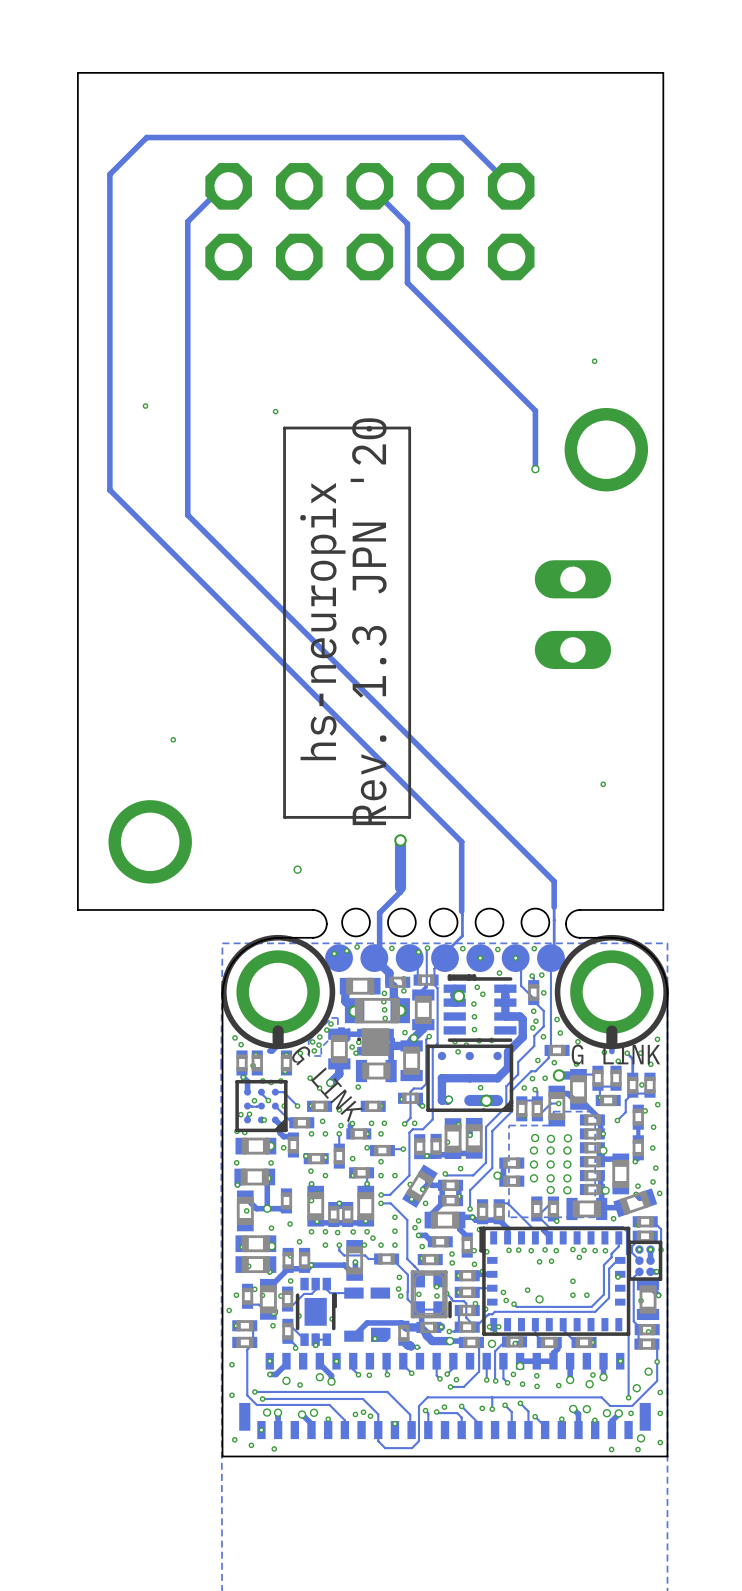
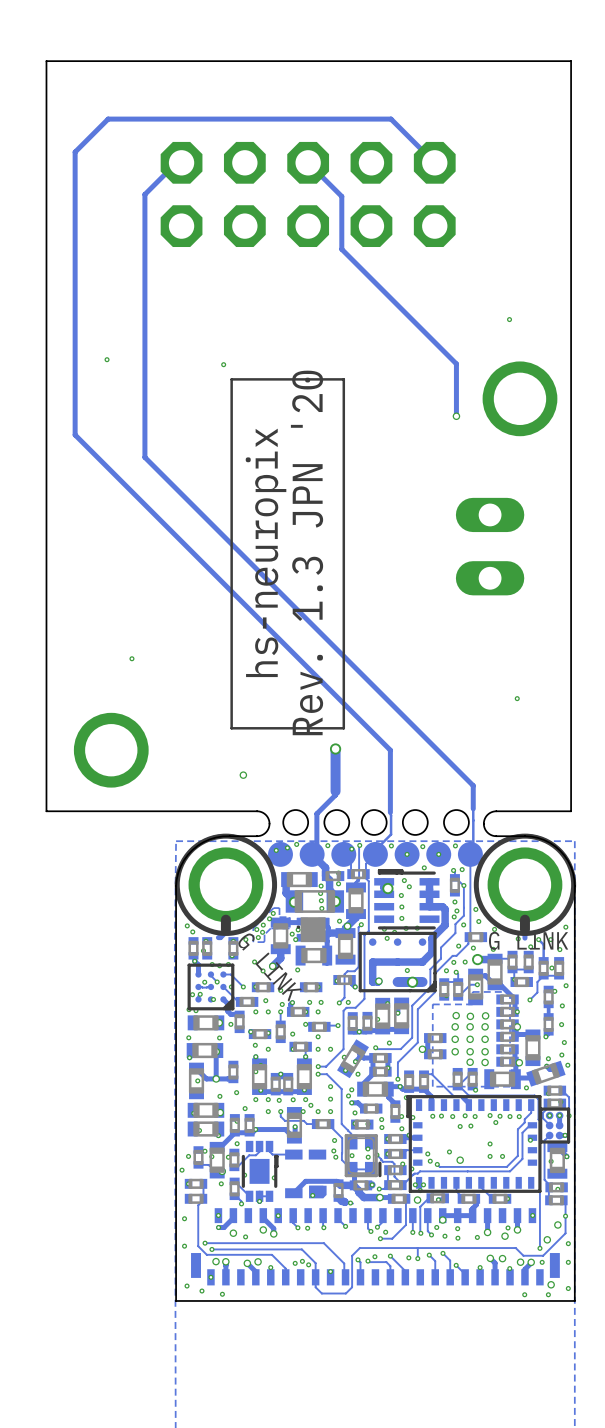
track: (521, 963) (521, 985) (543, 1010) -> (454, 877) (463, 886) (463, 901)

